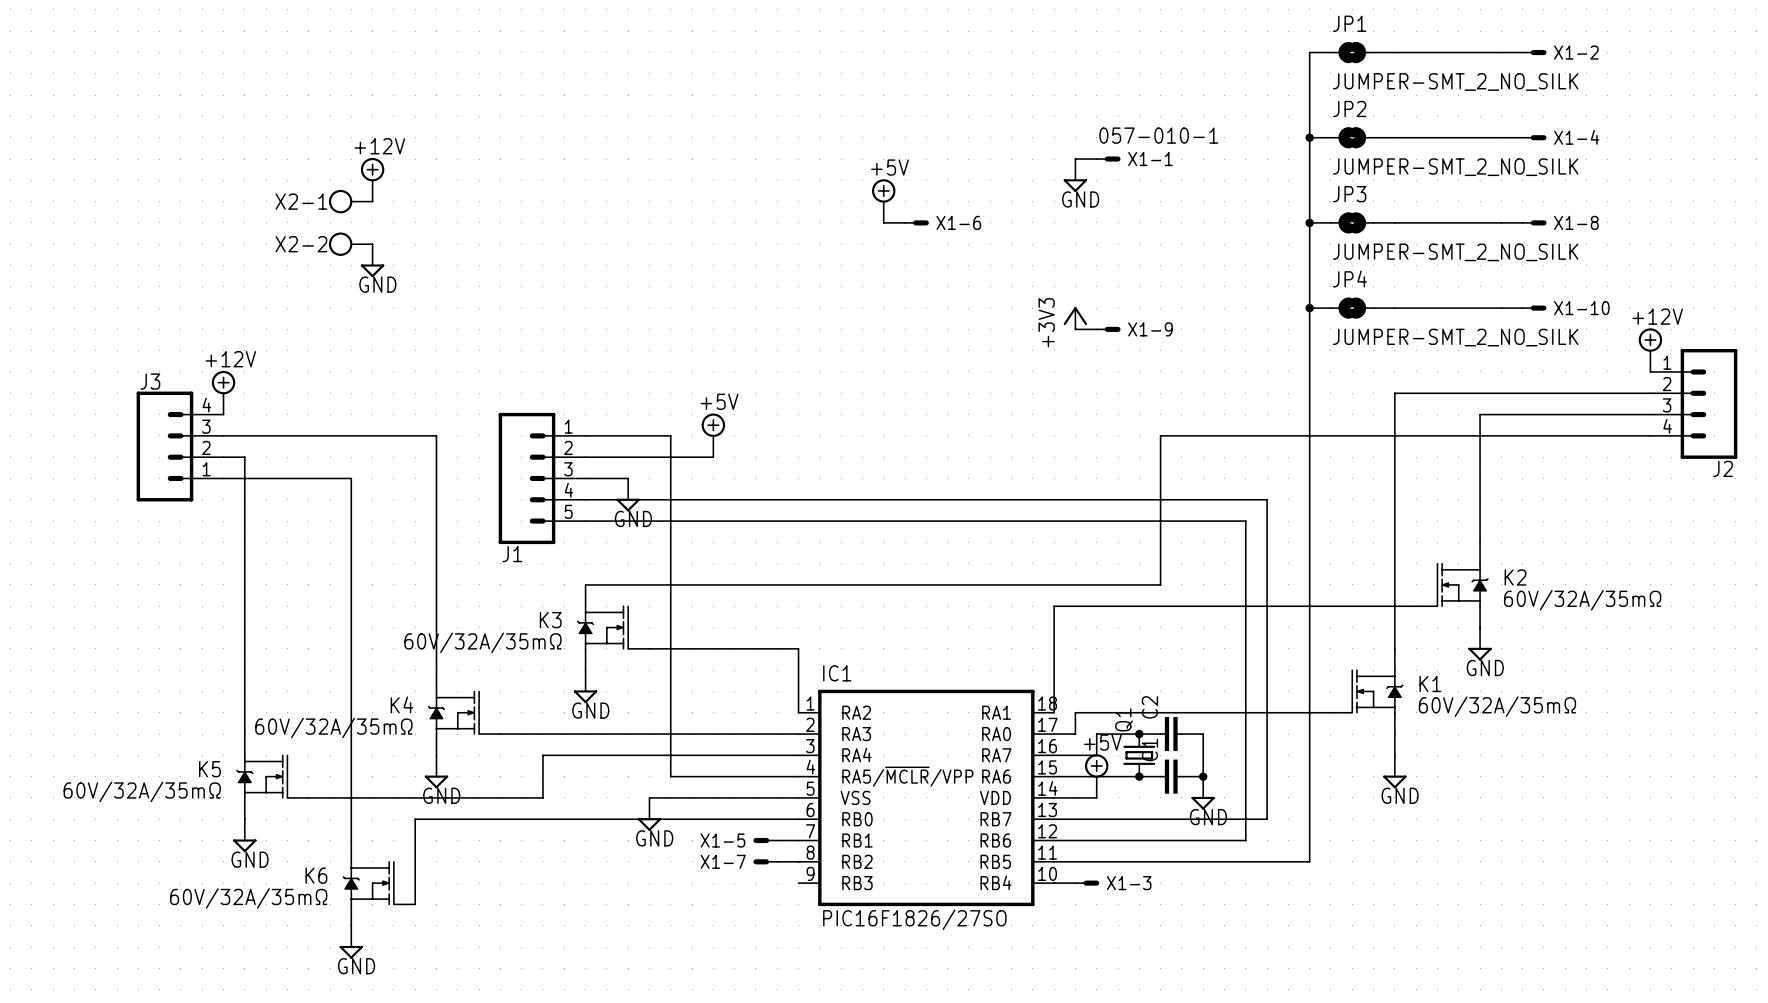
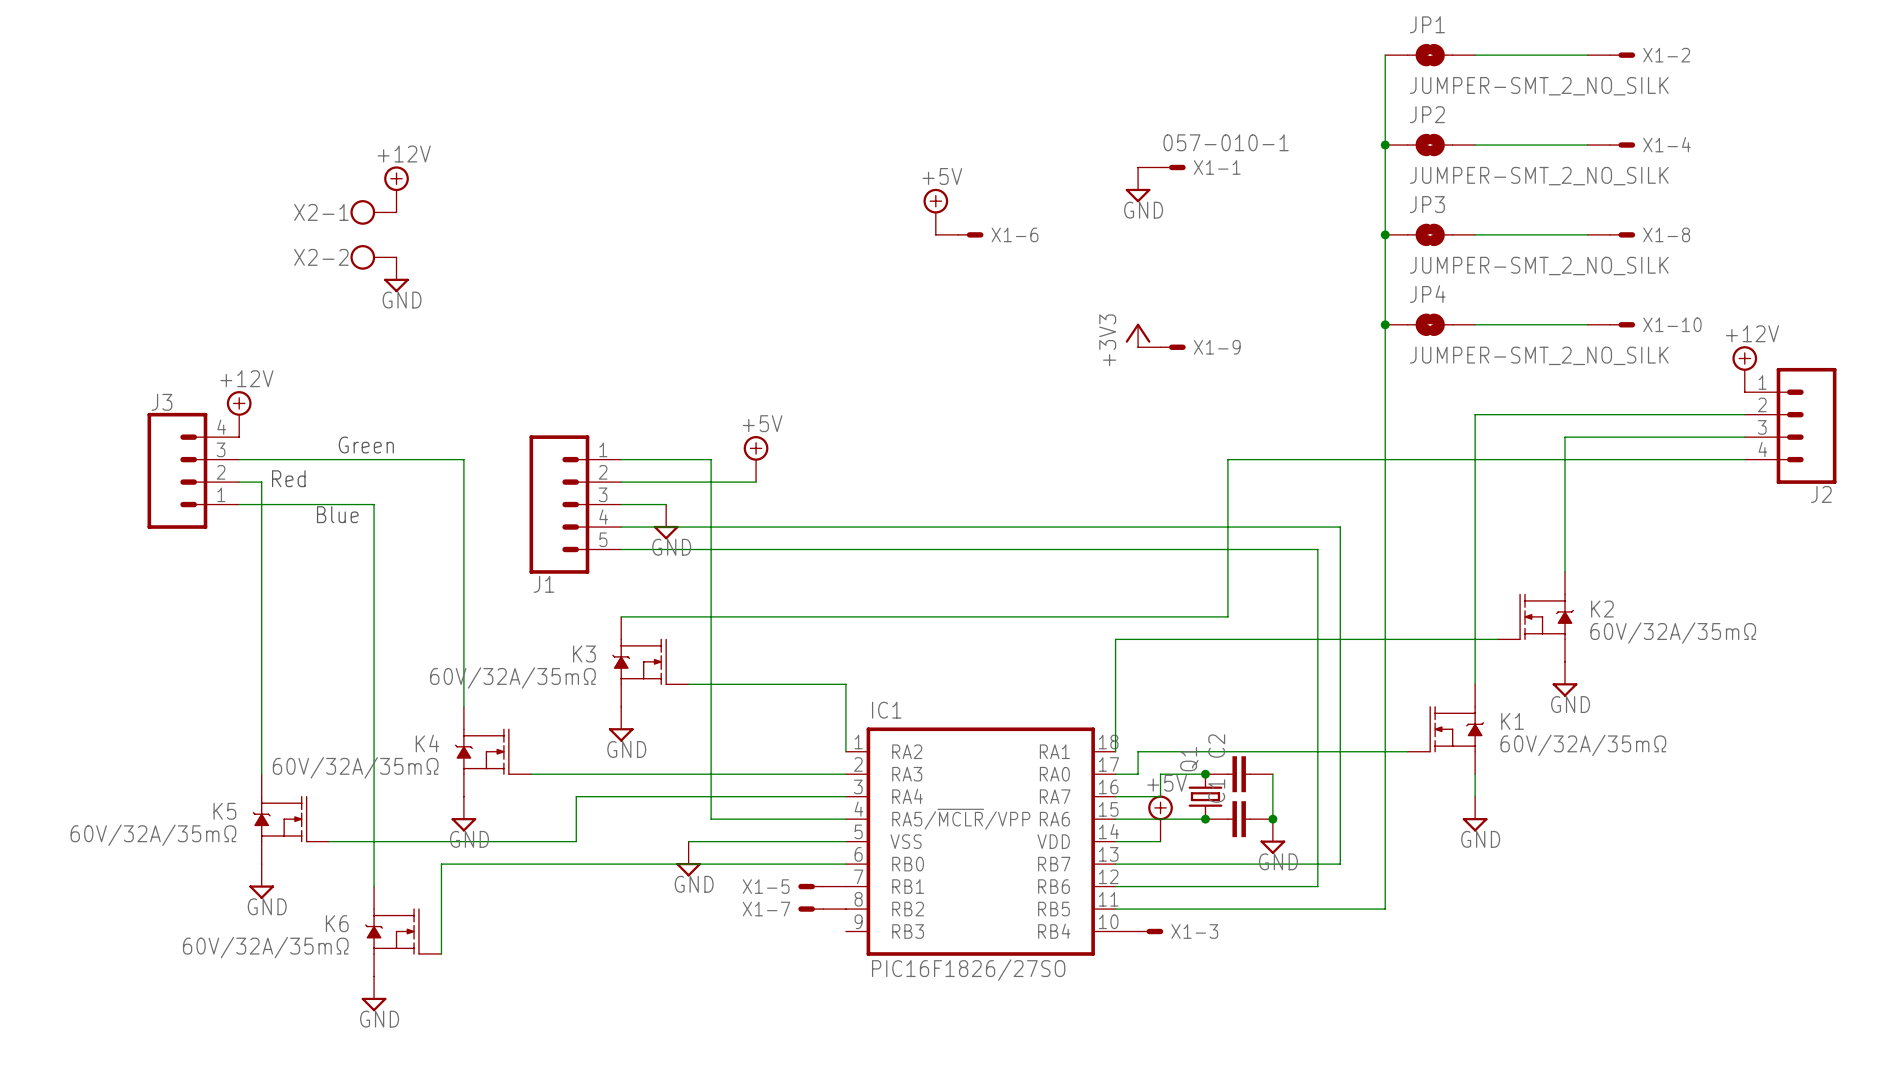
text: none -> Green (366, 445)
text: none -> Red (288, 478)
text: none -> Blue (337, 514)

